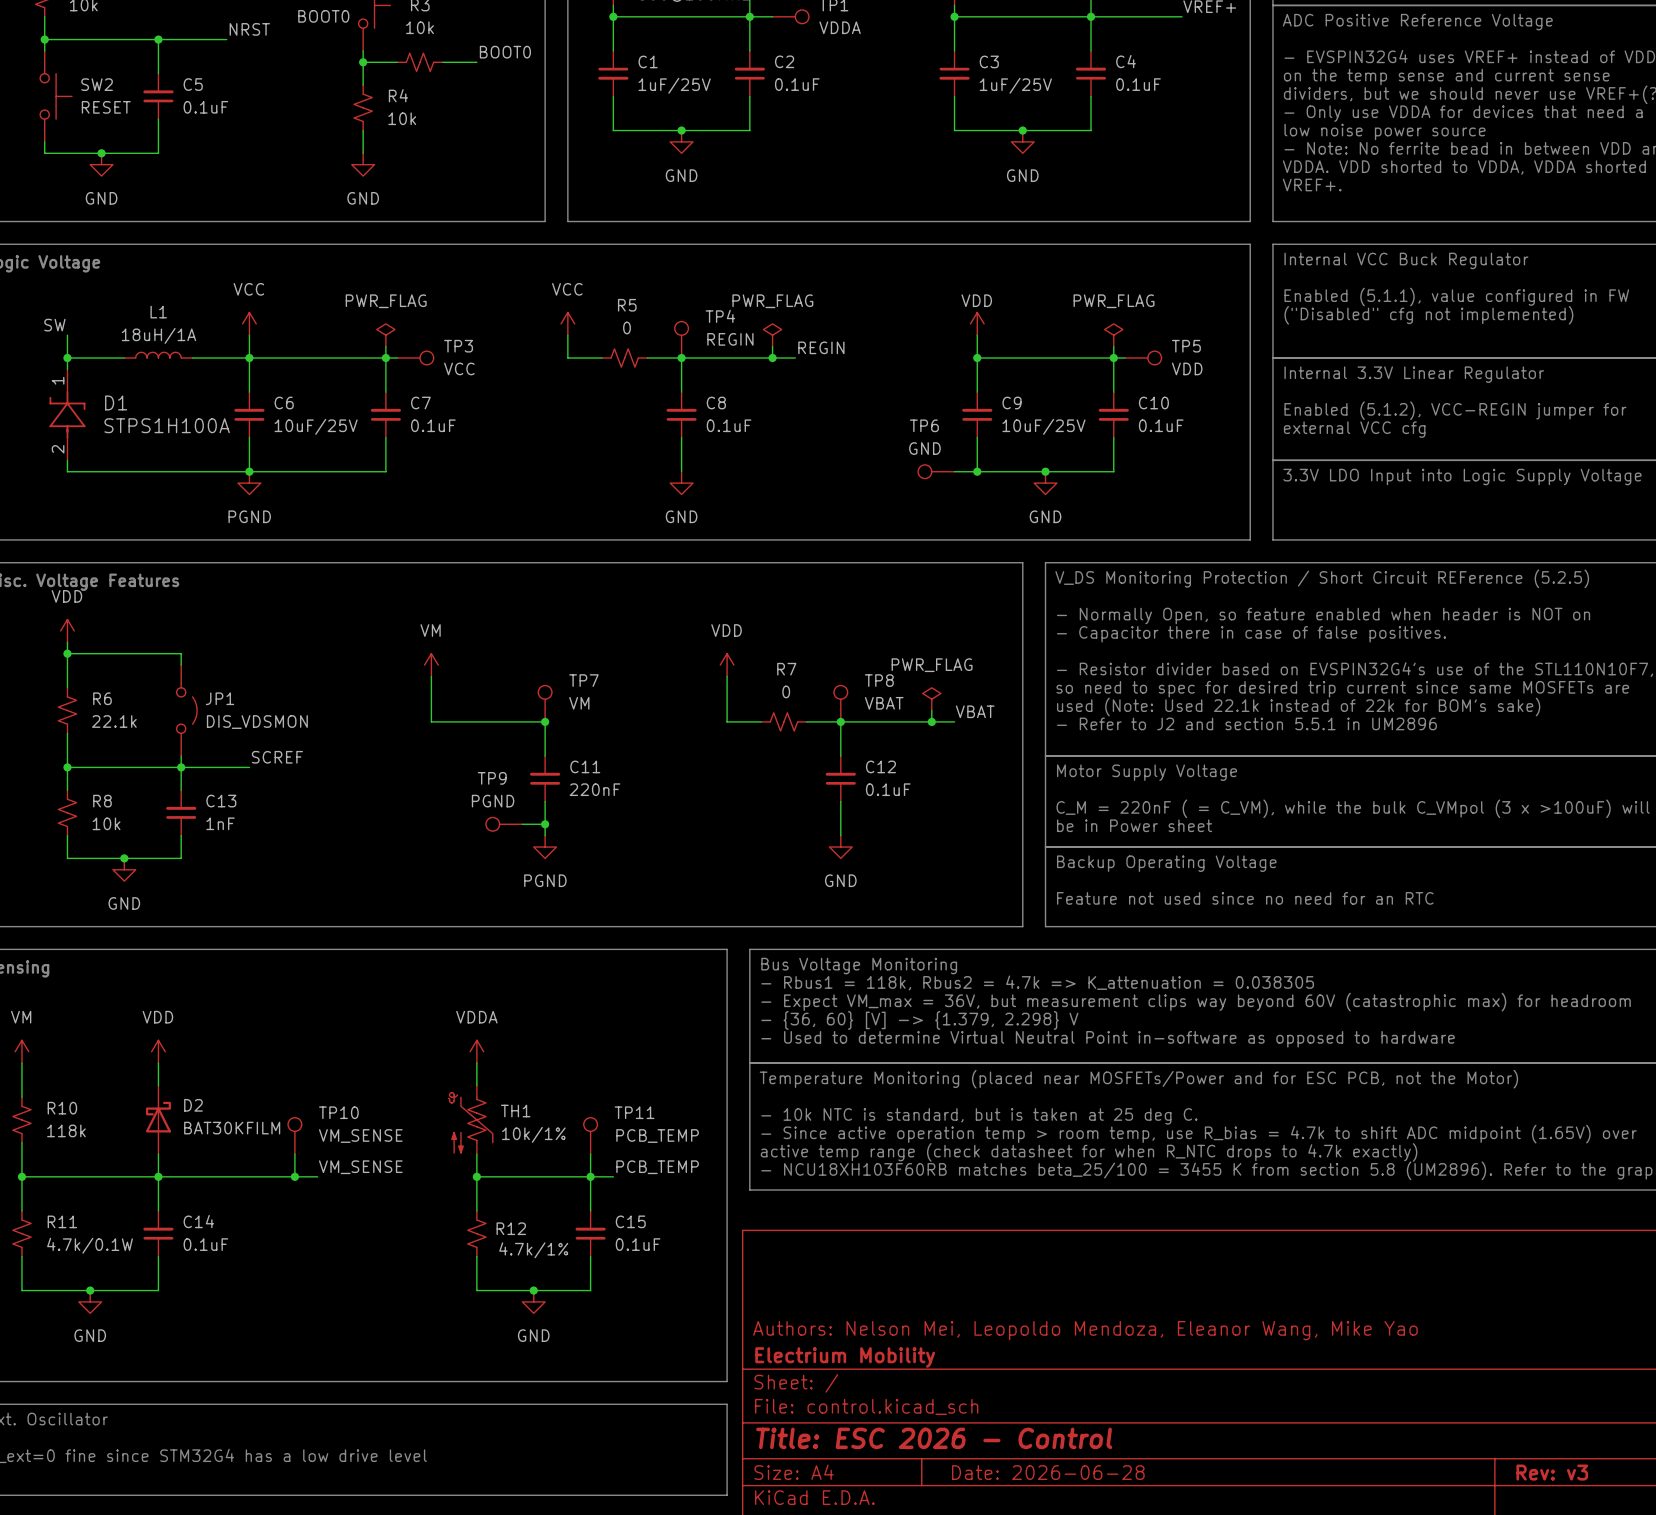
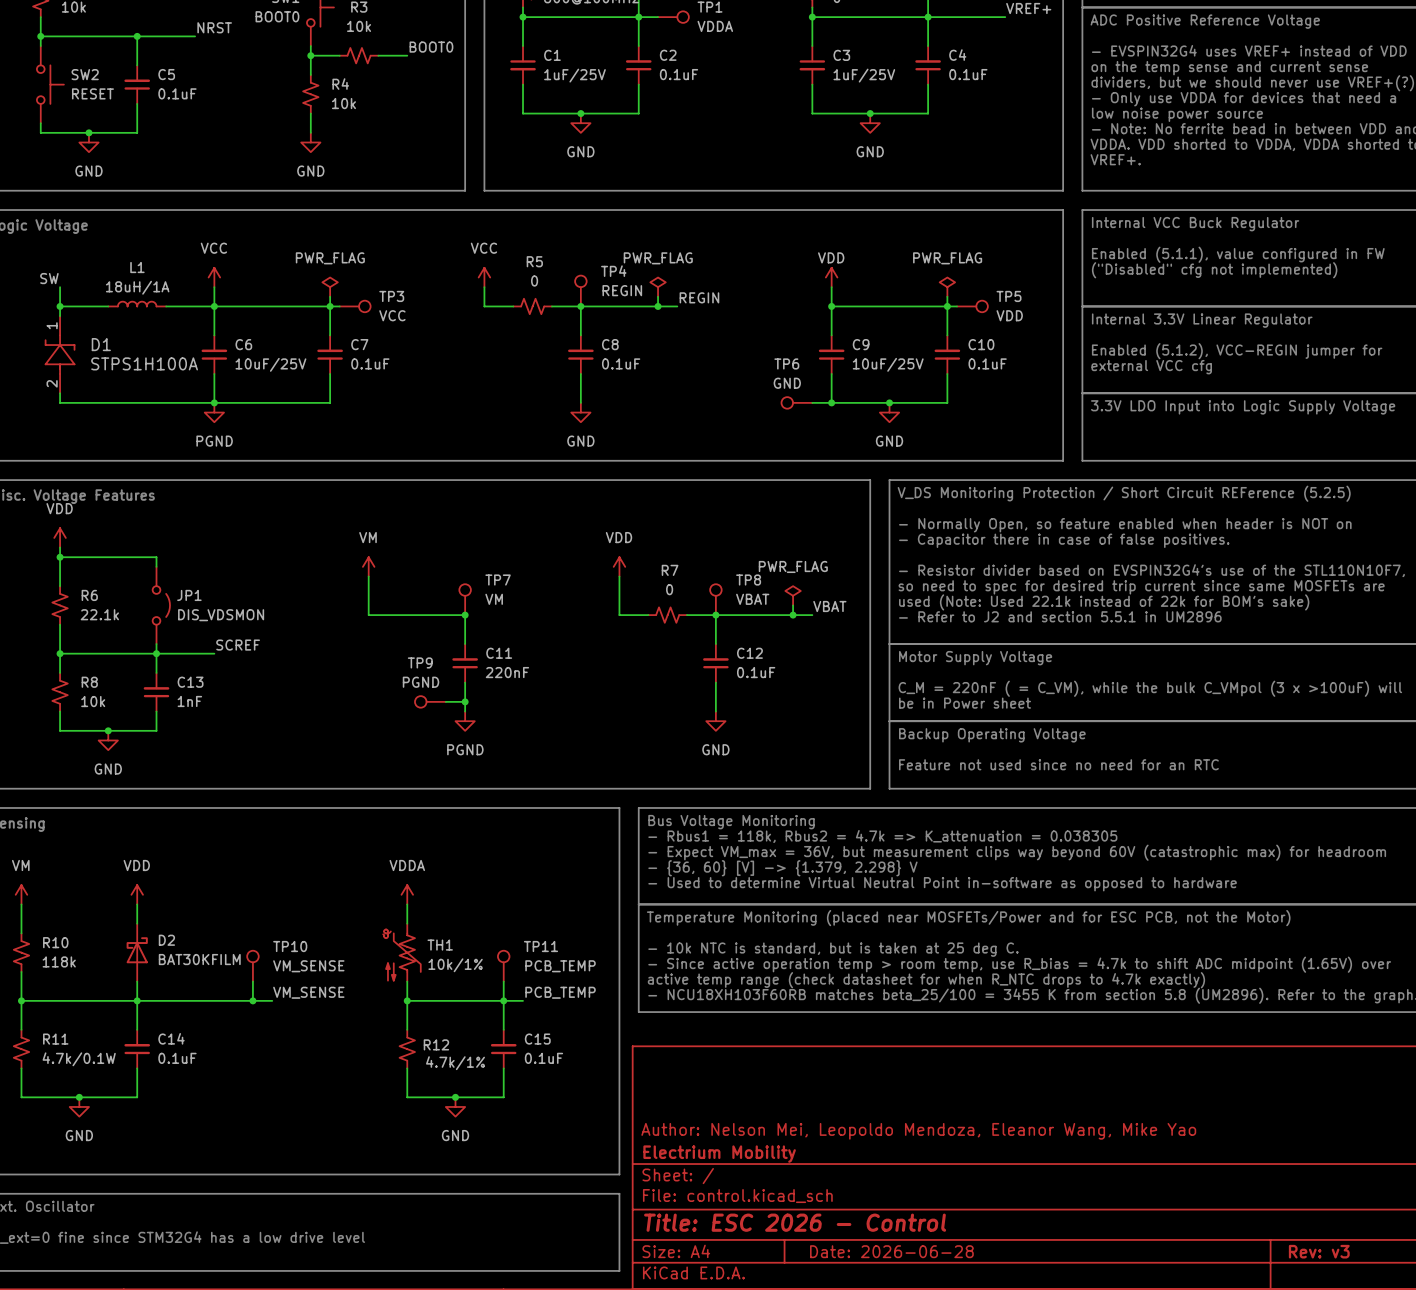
title block: Authors: Nelson Mei, Leopoldo Mendoza, Eleanor Wang, Mike Yao (1085, 1330) -> Author: Nelson Mei, Leopoldo Mendoza, Eleanor Wang, Mike Yao (918, 1131)

